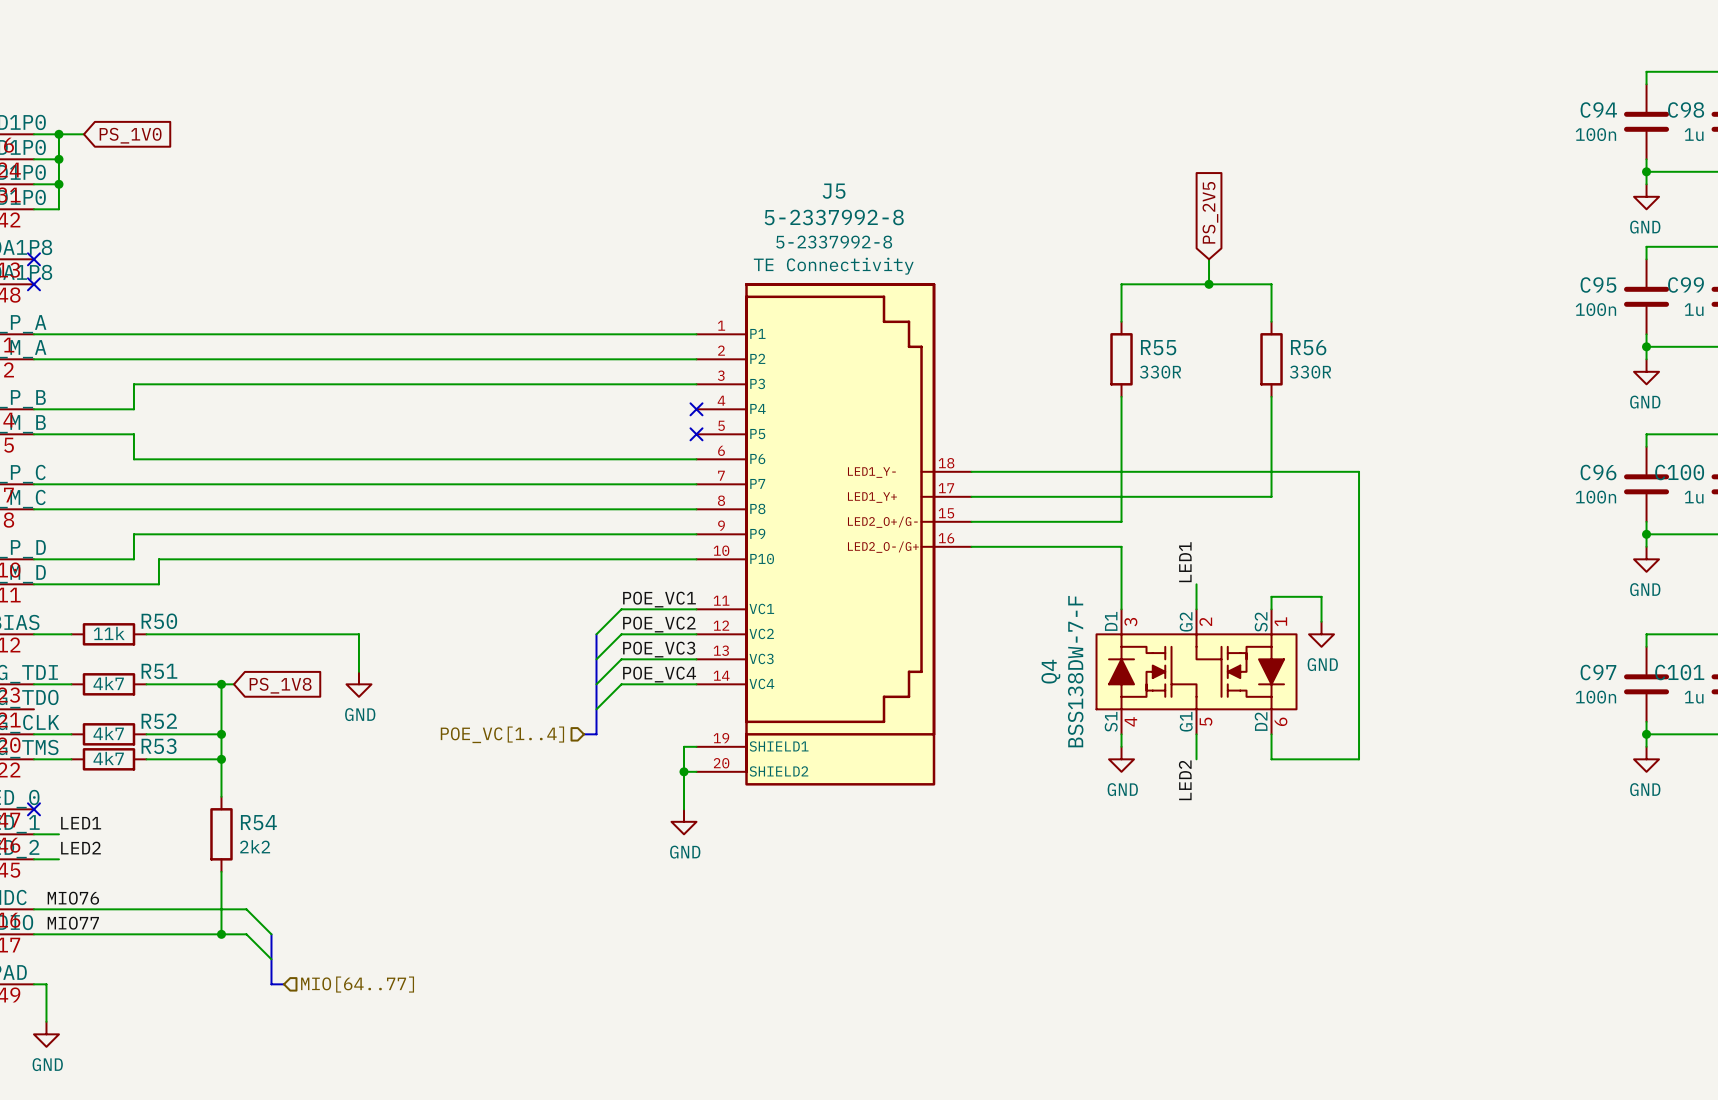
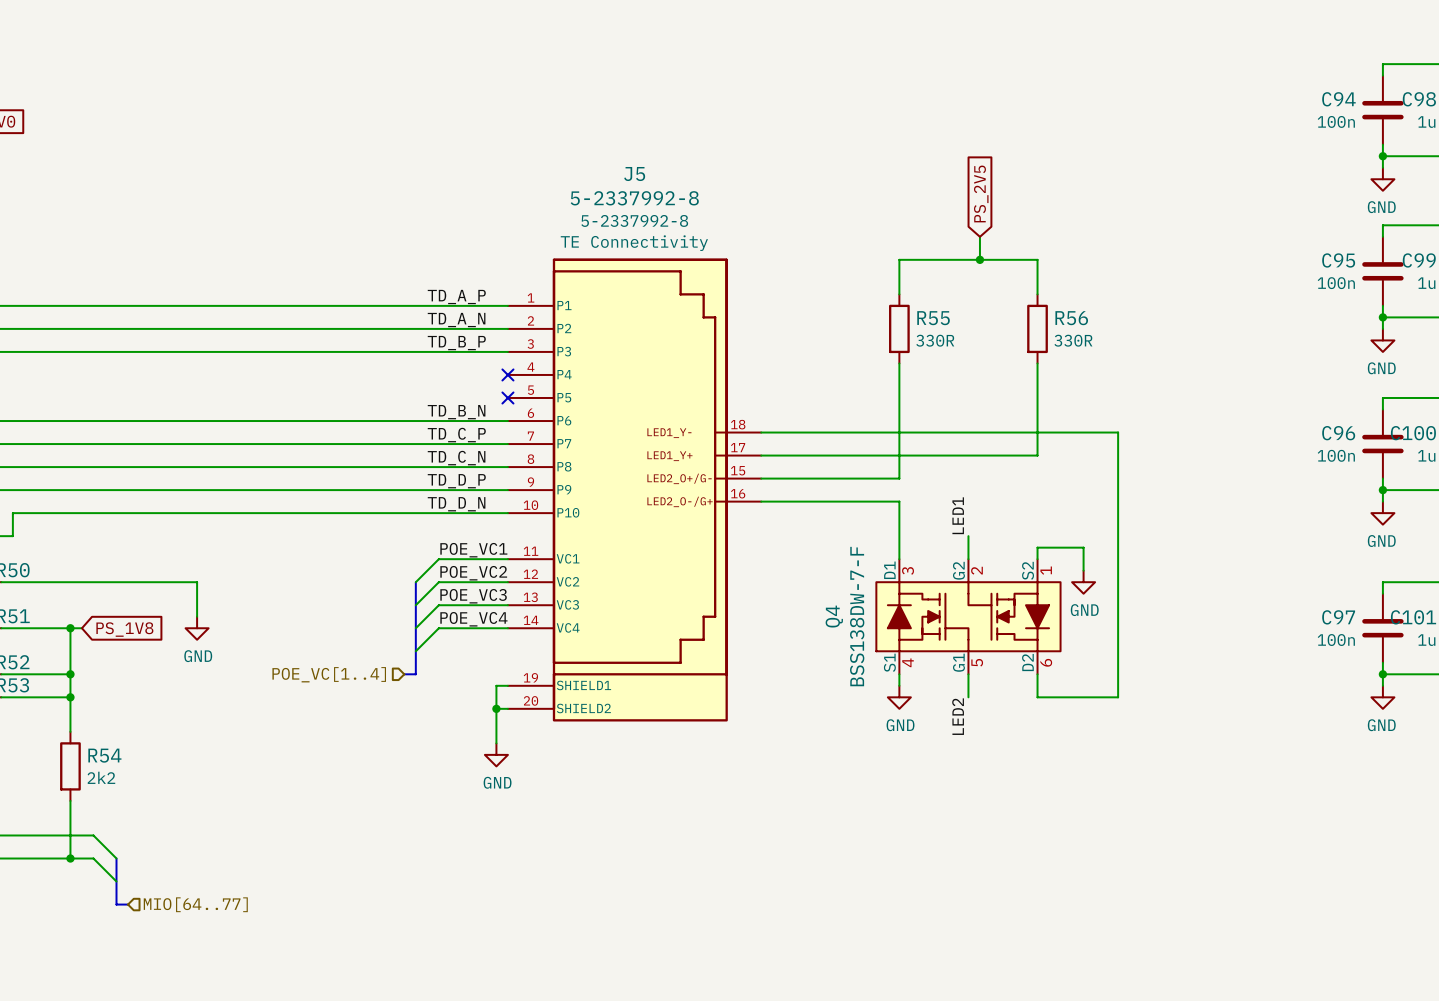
label: none -> TD_A_P (456, 297)
label: none -> TD_A_N (456, 320)
label: none -> TD_B_P (456, 343)
label: none -> TD_B_N (456, 412)
label: none -> TD_C_P (456, 435)
label: none -> TD_C_N (456, 458)
label: none -> TD_D_P (456, 481)
label: none -> TD_D_N (456, 504)

